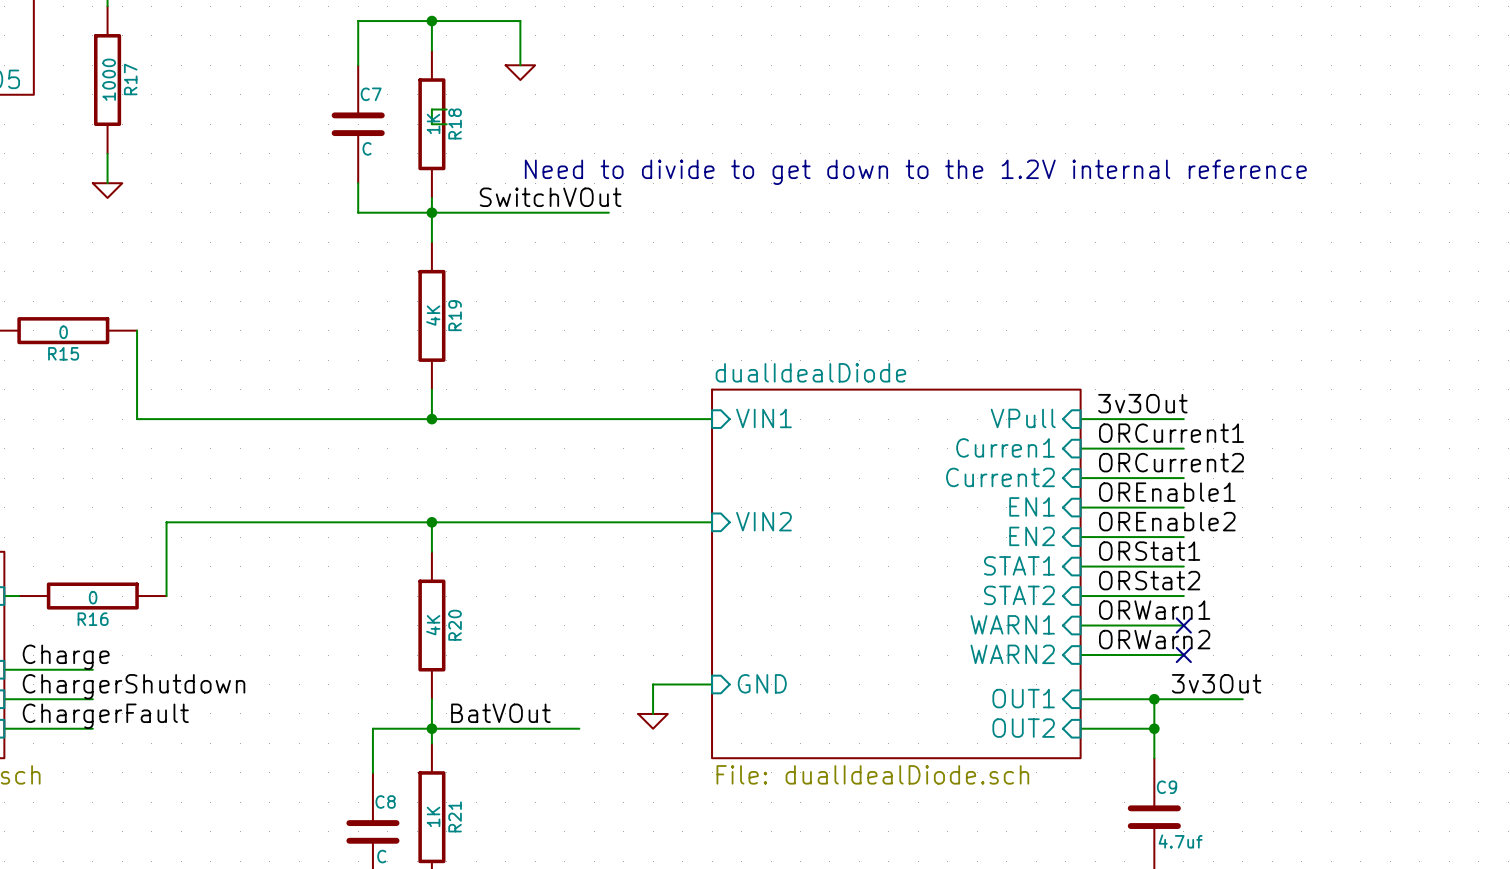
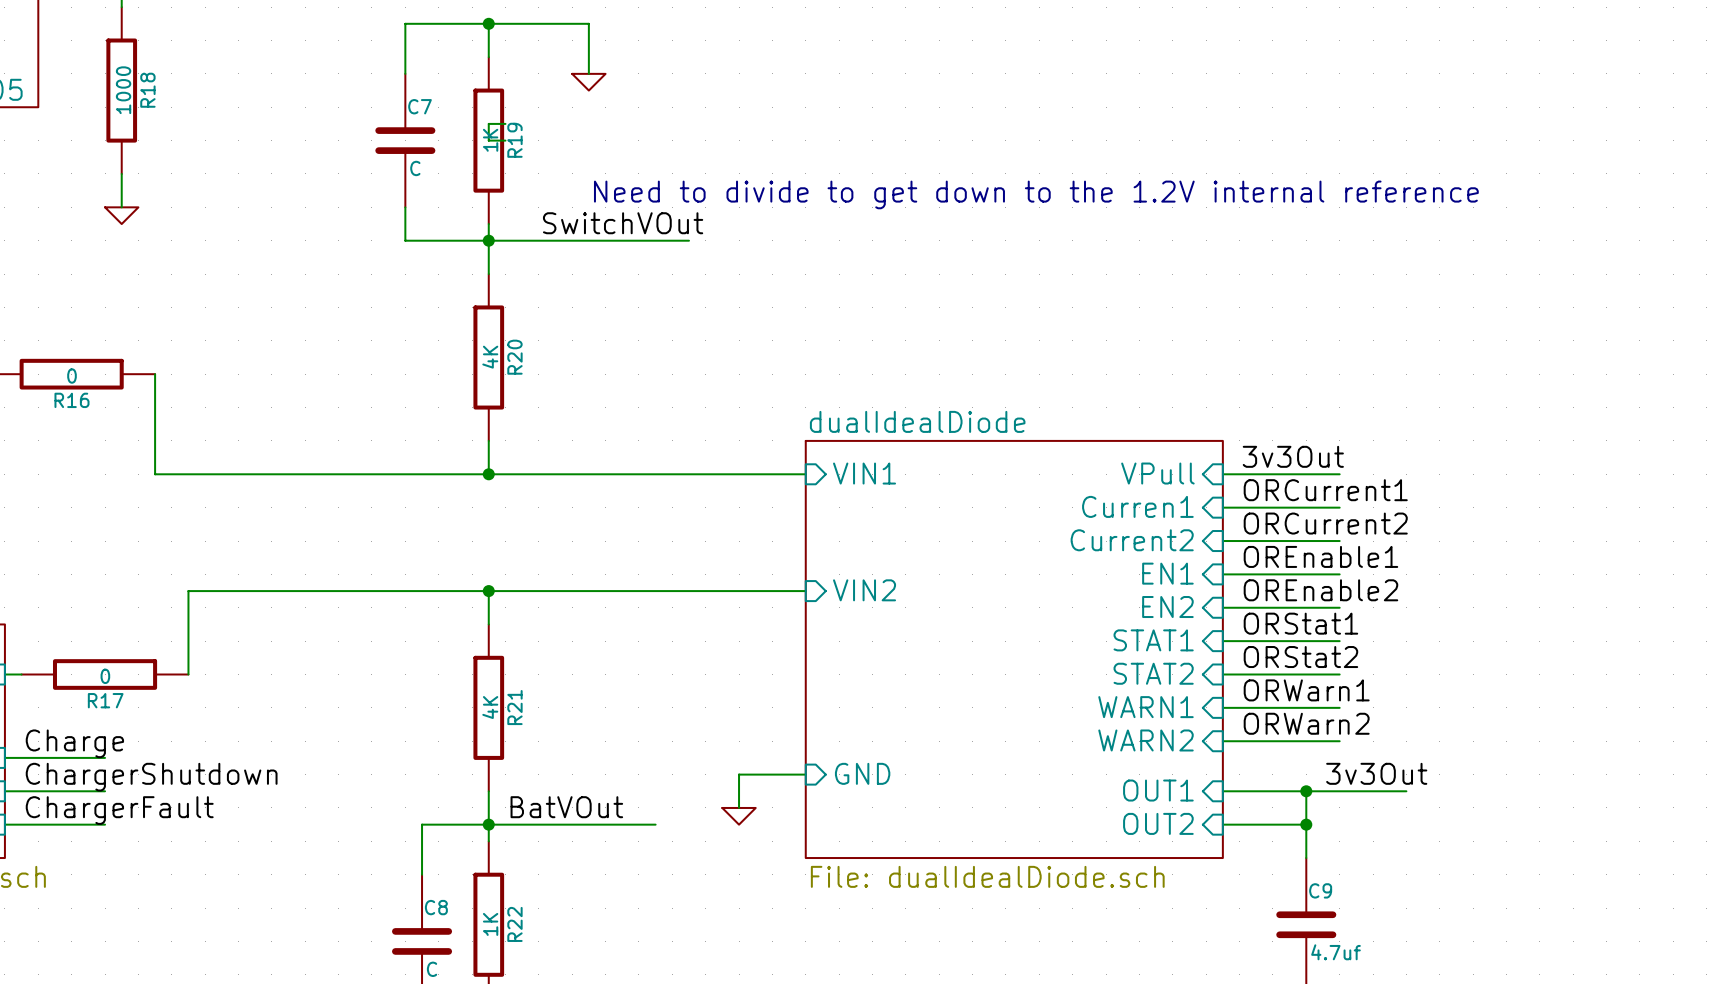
R17 name: R17 (130, 79) -> R18 (147, 90)
R18 name: R18 (455, 123) -> R19 (514, 140)
R19 name: R19 (455, 315) -> R20 (514, 357)
R15 name: R15 (63, 353) -> R16 (71, 400)
R16 name: R16 (93, 619) -> R17 (105, 700)
R20 name: R20 (455, 625) -> R21 (514, 707)
no-connect mark: (1183, 625) -> none
no-connect mark: (1183, 655) -> none
R21 name: R21 (455, 816) -> R22 (514, 924)

